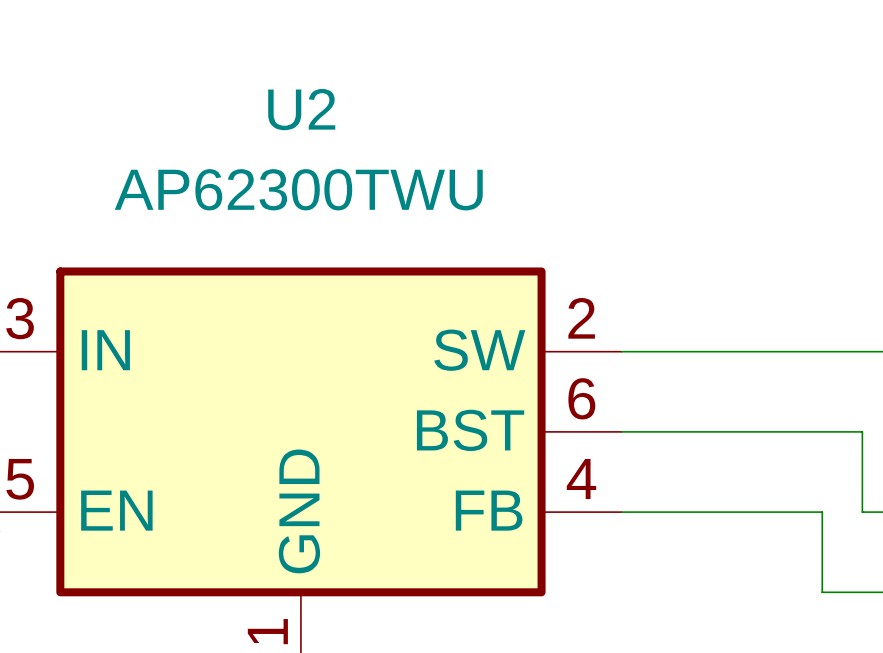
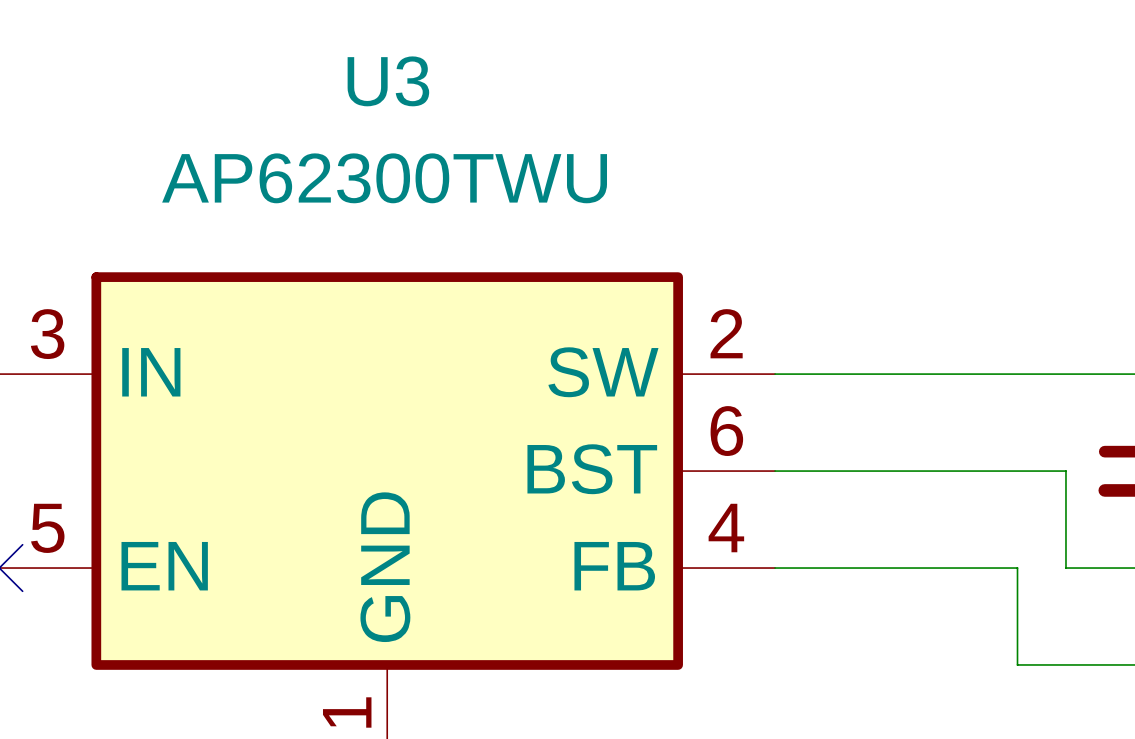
U2 name: U2 (301, 109) -> U3 (388, 81)

